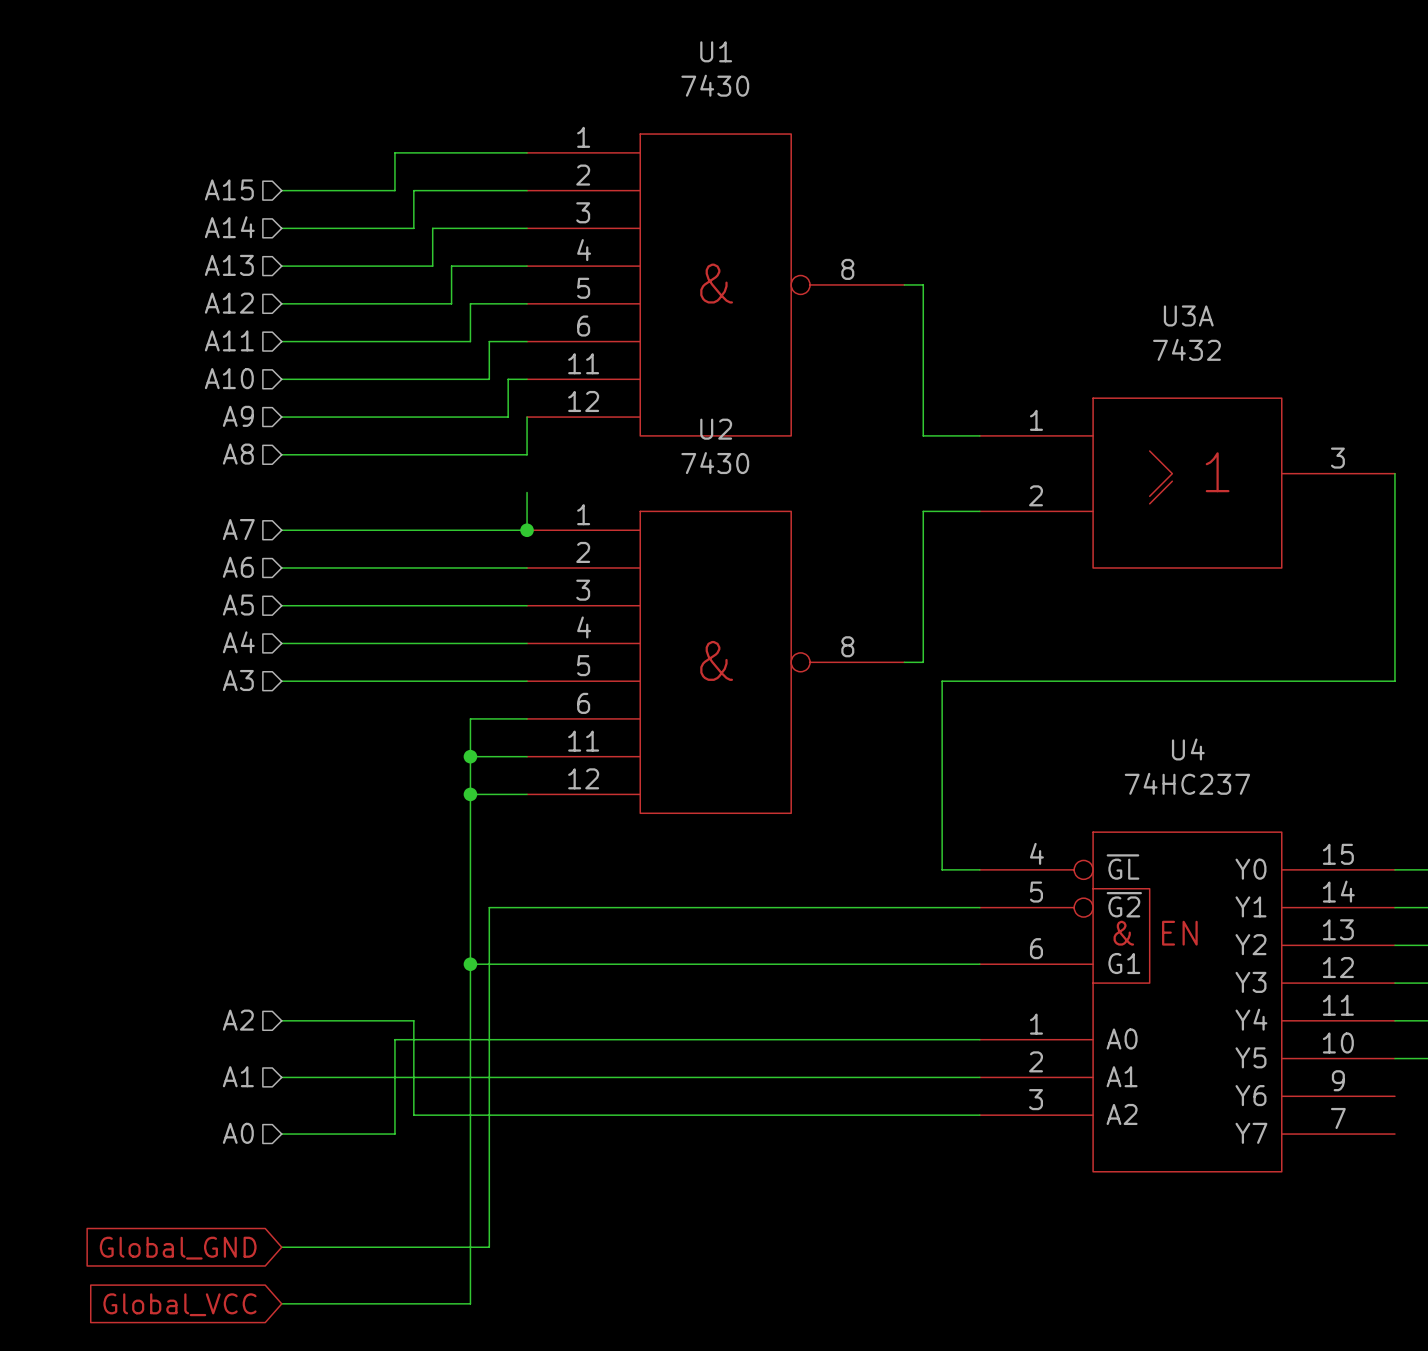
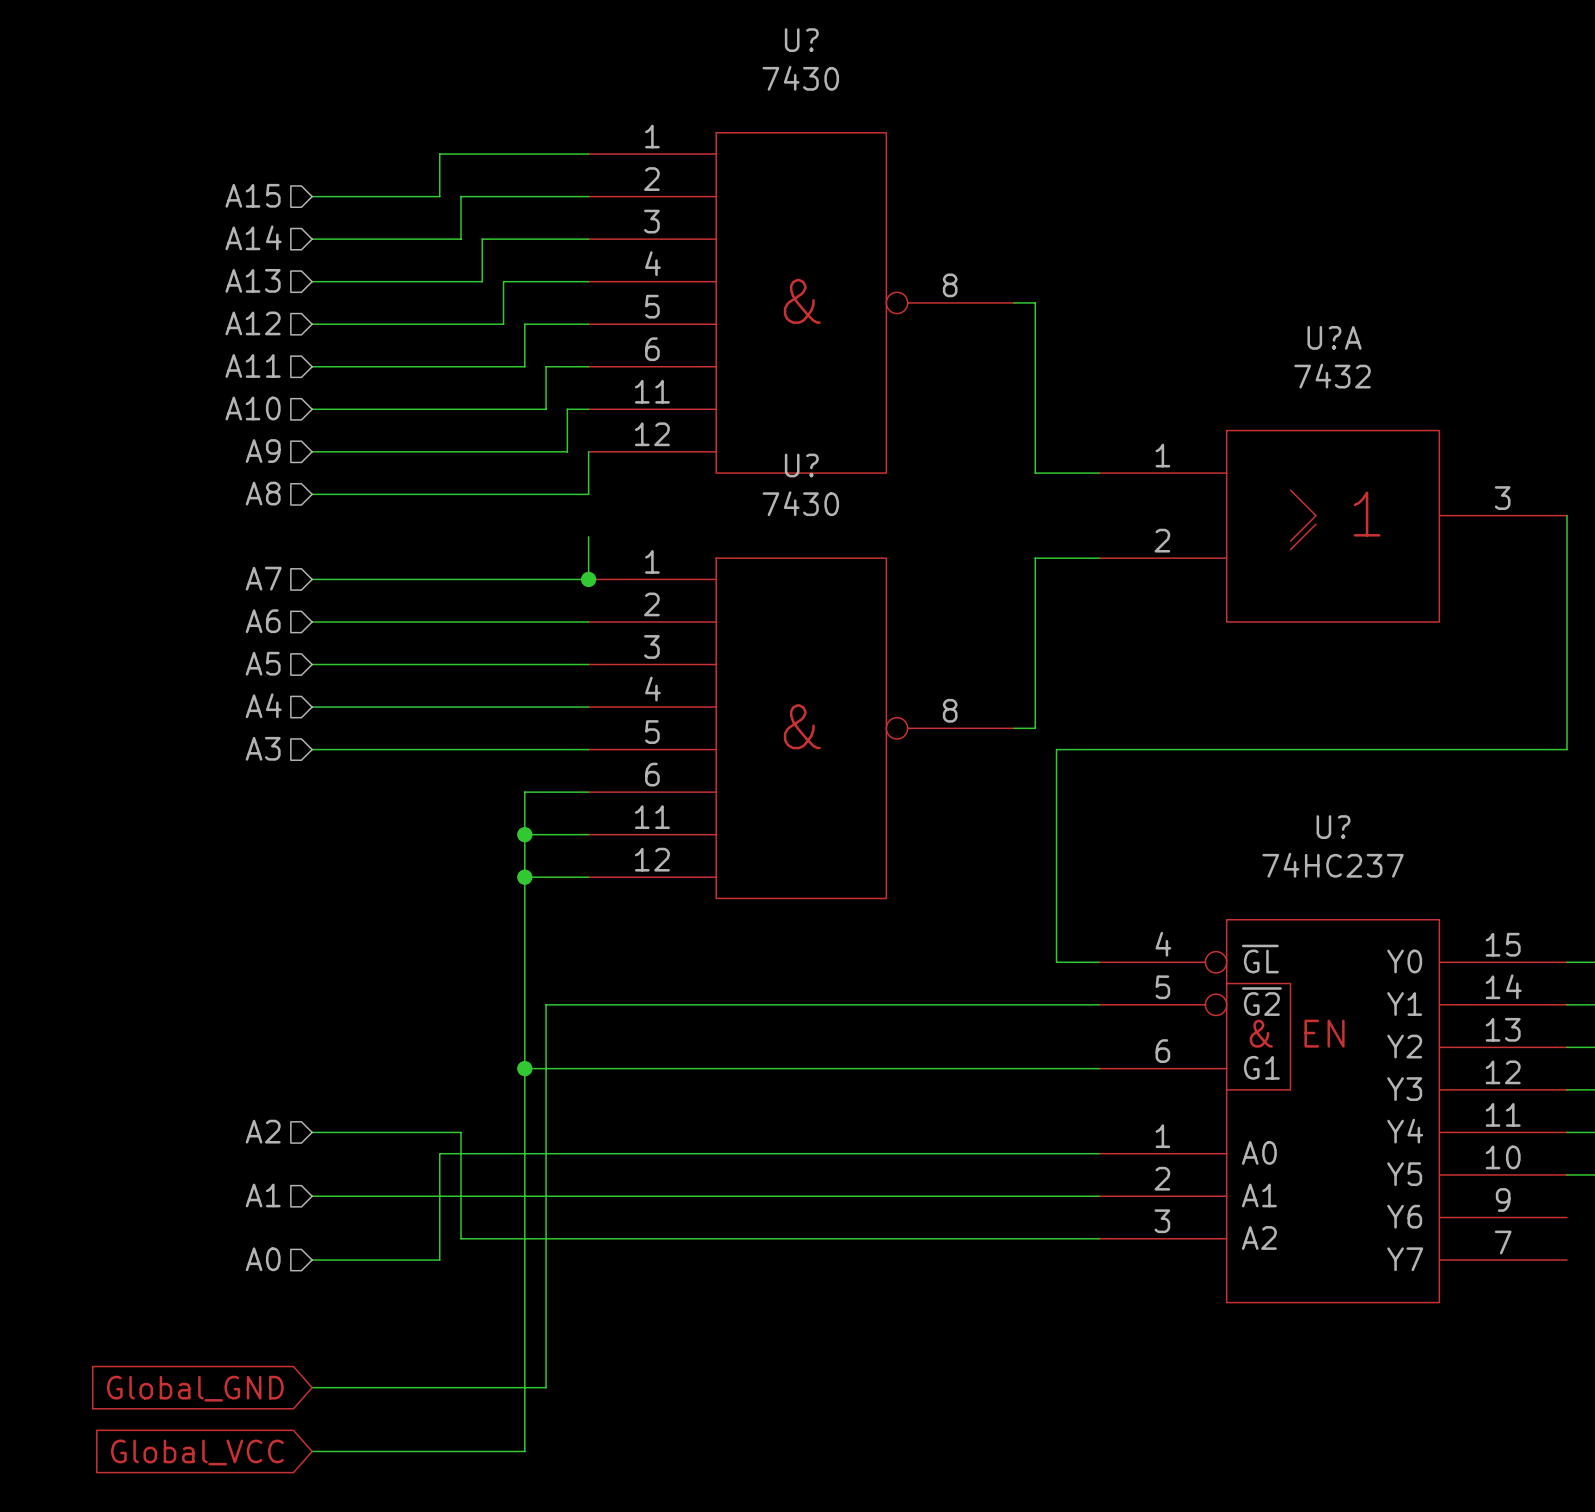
U1 name: U1 (716, 51) -> U? (801, 40)
U3A name: U3A (1188, 315) -> U?A (1334, 337)
U2 name: U2 (716, 429) -> U? (801, 465)
U4 name: U4 (1188, 749) -> U? (1333, 827)

